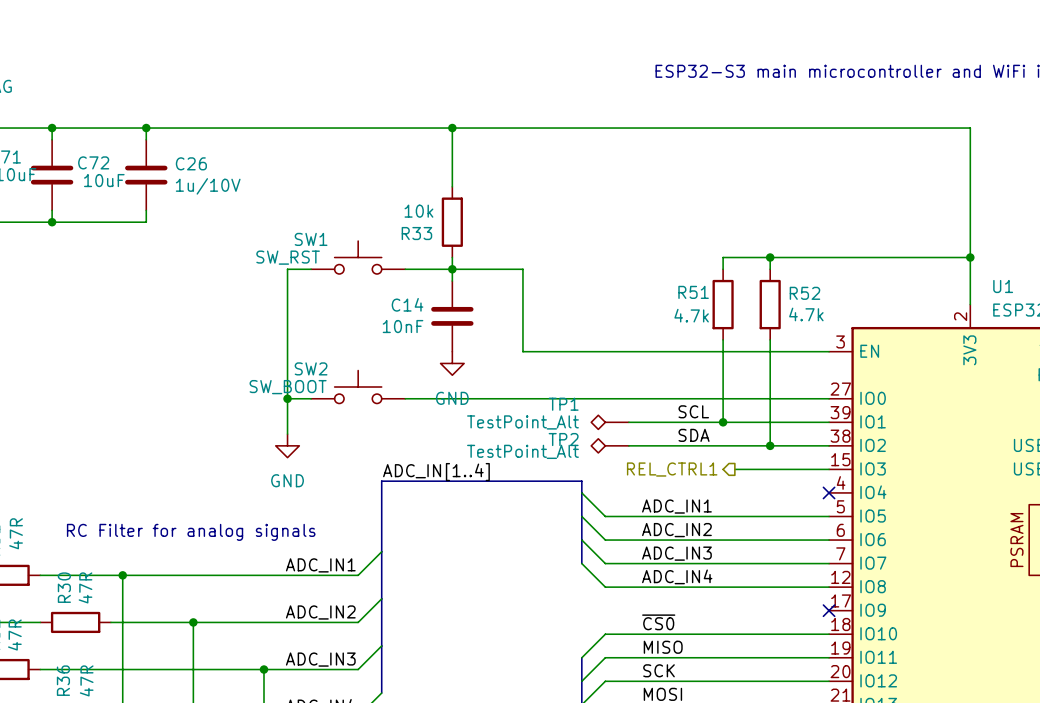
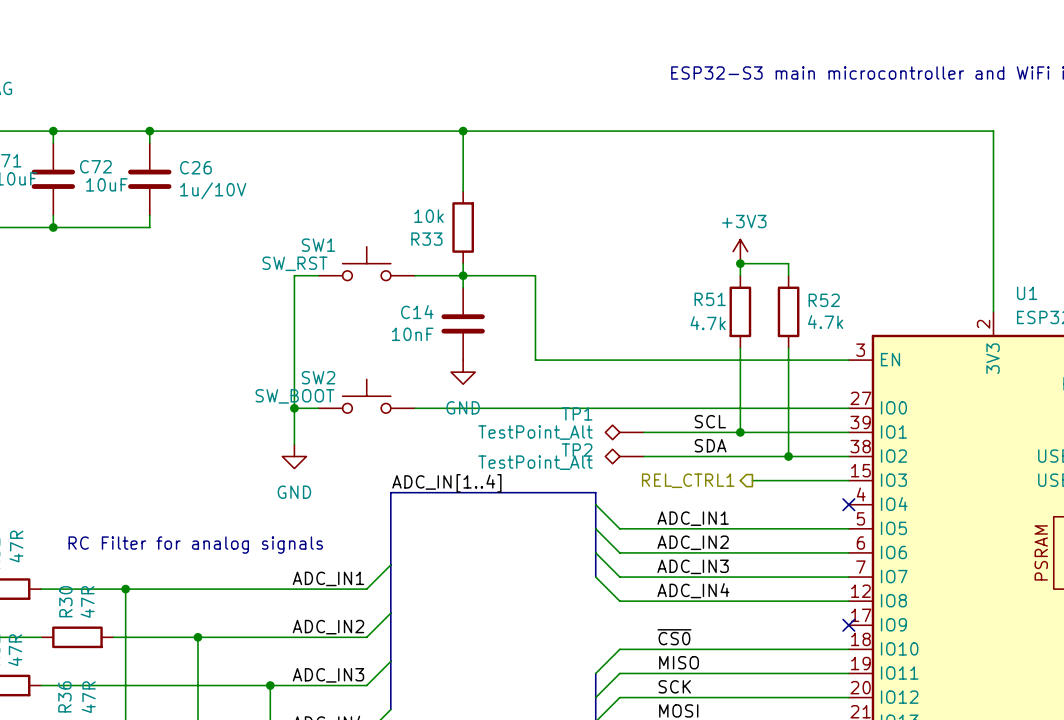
power symbol: none -> +3V3 (740, 251)
wire: (770, 257) (970, 257) -> none
junction position: (770, 257) -> (740, 263)
junction: (970, 257) -> none

